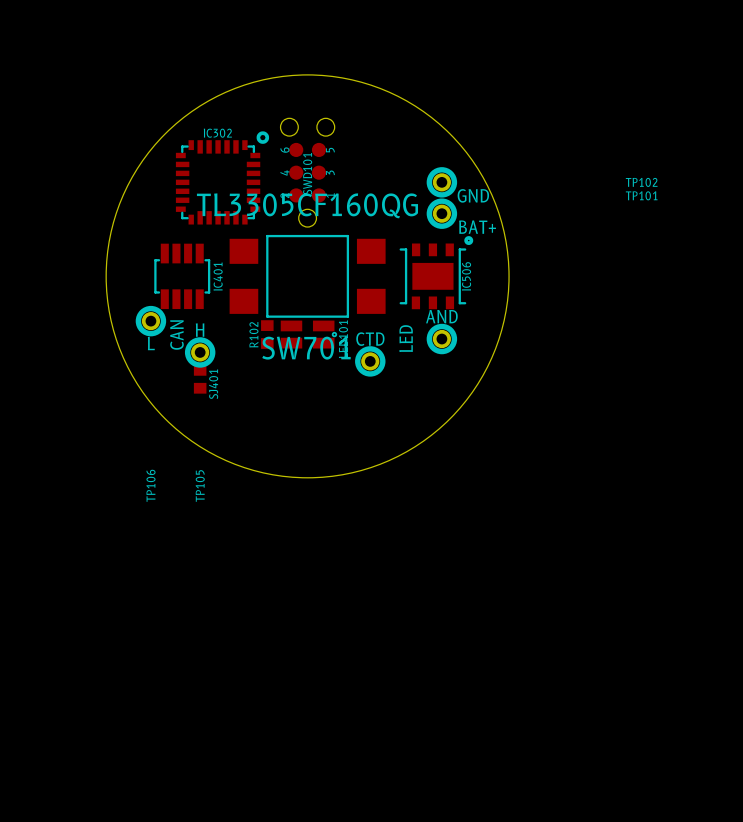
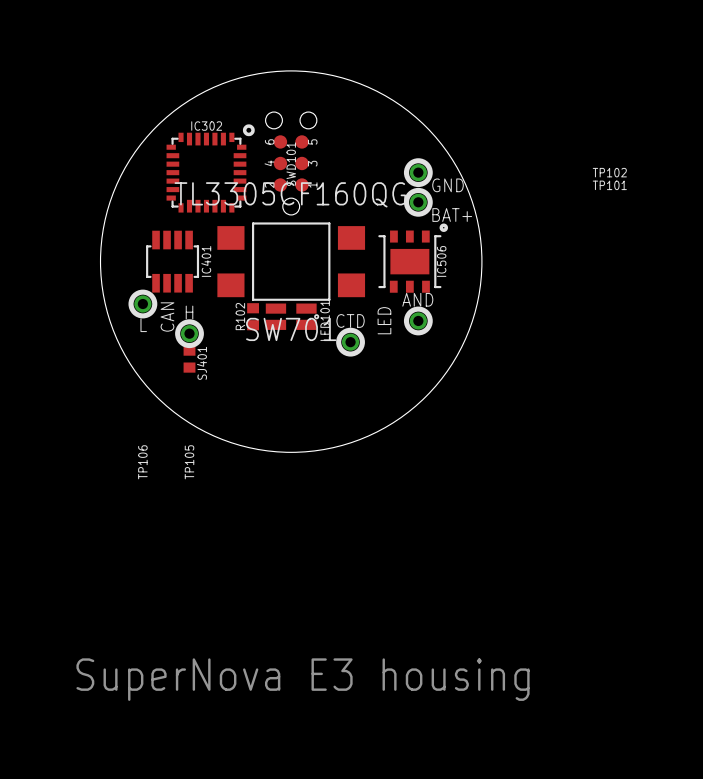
text: none -> SuperNova E3 housing (303, 679)

